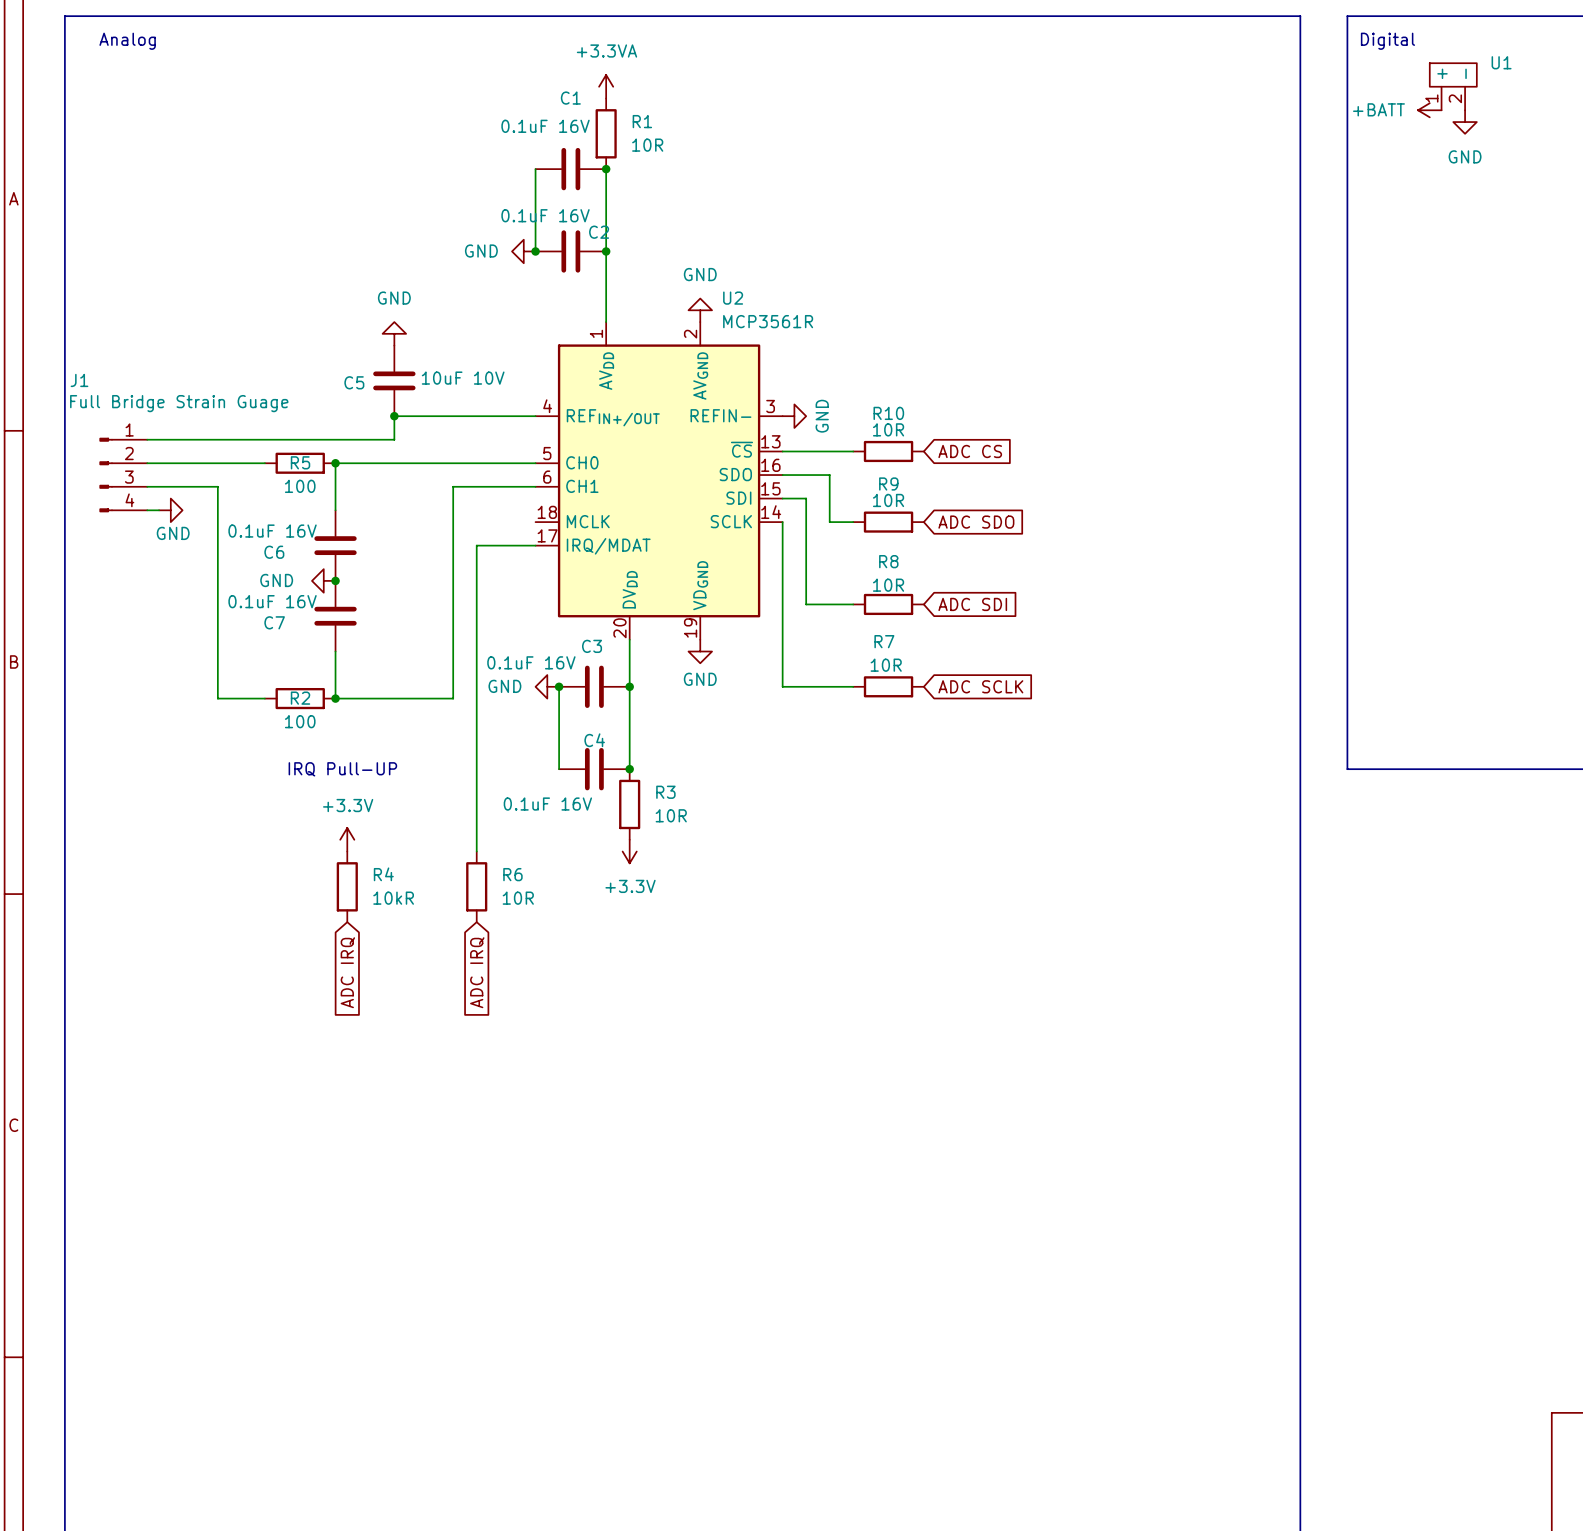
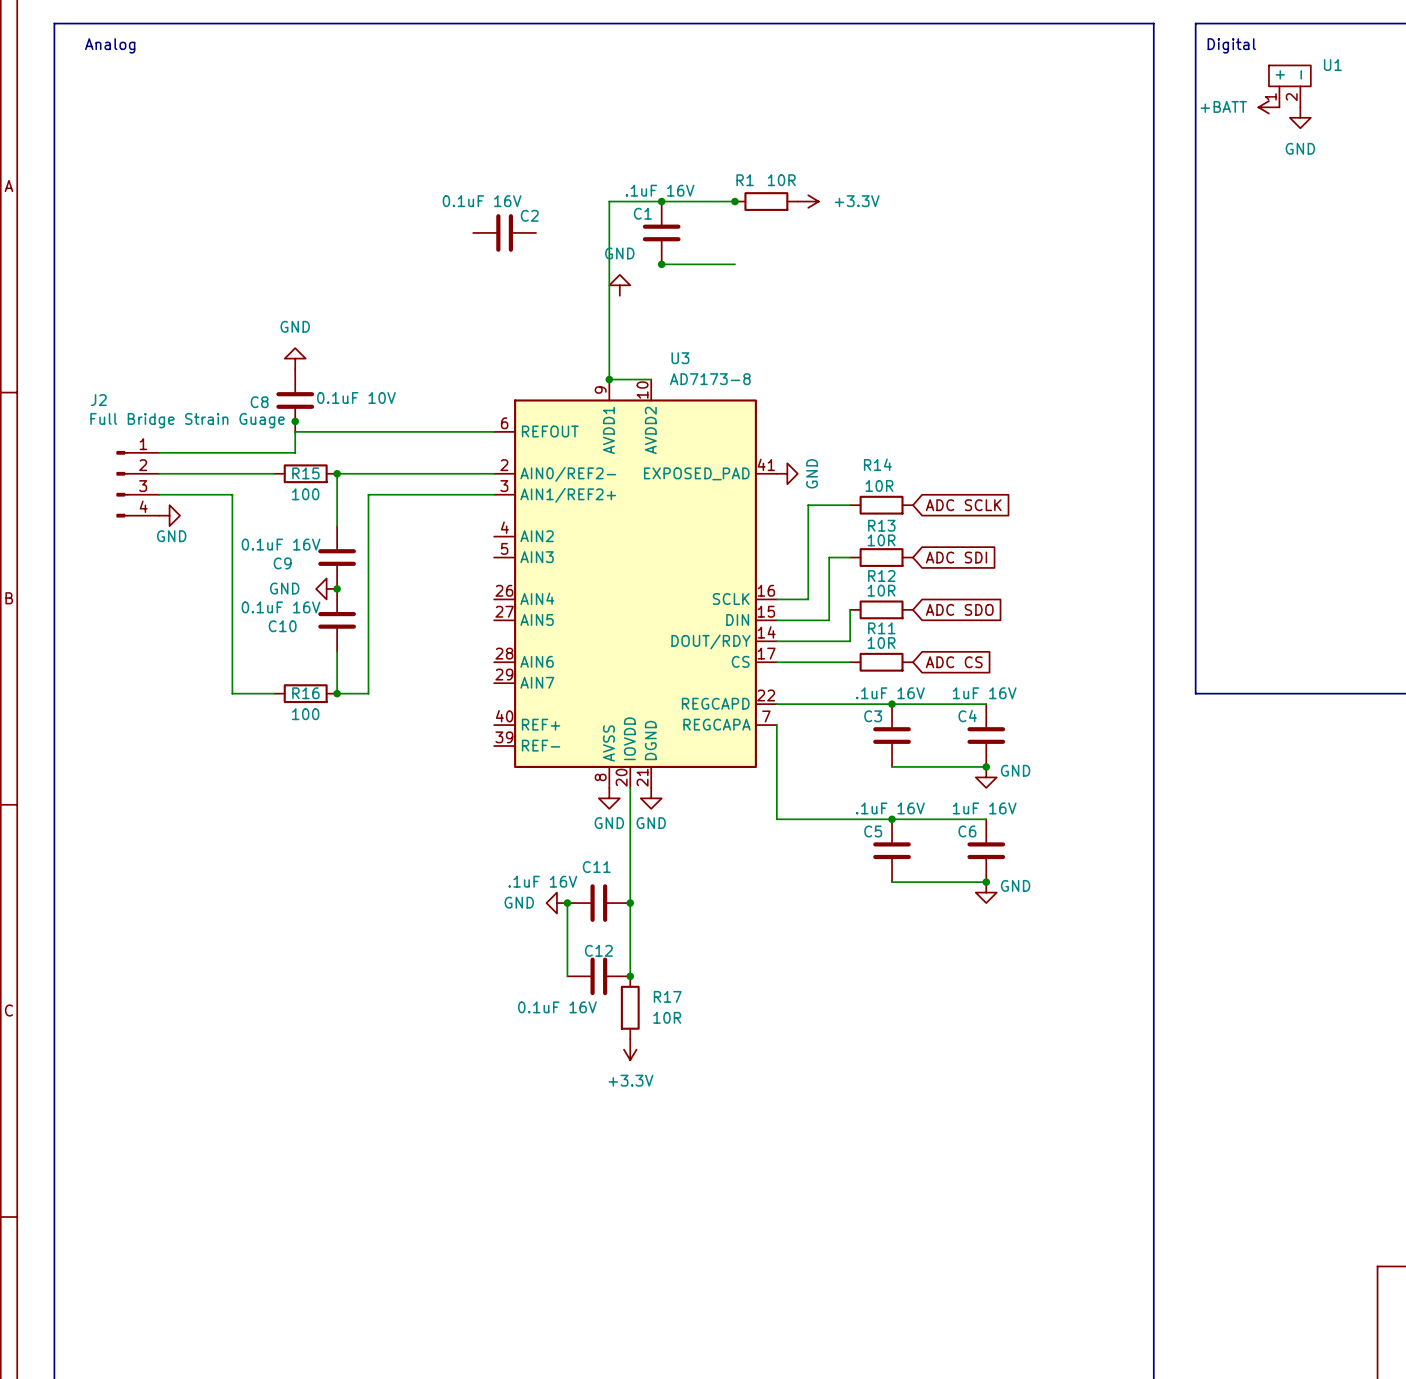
power symbol: +3.3VA (606, 86) -> none
C1 name position: C1 (570, 98) -> C1 (642, 213)
R1 name position: R1 (642, 121) -> R1 (745, 180)
C1 value: 0.1uF 16V (545, 126) -> .1uF 16V (660, 190)
R1 rotation: 0° (606, 133) -> 90° clockwise (766, 201)
R1 position: (606, 133) -> (766, 201)
R1 value position: 10R (647, 145) -> 10R (781, 180)
wire: (535, 169) (535, 251) -> none
C1 rotation: 0° (570, 169) -> 90° clockwise (661, 232)
C1 position: (570, 169) -> (661, 232)
wire: (606, 169) (606, 322) -> none
junction: (606, 169) -> none
junction: none -> (661, 201)
wire: none -> (734, 201) (609, 201) (609, 379) (651, 379)
junction: none -> (734, 201)
power symbol: none -> +3.3V (808, 201)
power symbol: GND (523, 251) -> none
junction: (535, 251) -> none
junction: (606, 251) -> none
wire: none -> (661, 264) (734, 264)
junction: none -> (661, 264)
power symbol position: GND (394, 333) -> GND (295, 358)
C5 value: 10uF 10V (463, 378) -> .1uF 16V (890, 808)
C5 position: (394, 380) -> (892, 850)
C5 name position: C5 (354, 382) -> C5 (873, 831)
junction: (394, 416) -> none
wire: (535, 416) (394, 416) (394, 439) (147, 439) -> none
junction: none -> (609, 379)
power symbol: GND (794, 416) -> none
C8: none -> 0.1uF 10V (295, 400)
R10: 10R (888, 451) -> none
global label: ADC CS (970, 451) -> none
wire: (147, 463) (264, 463) -> none
R5: 100 (300, 463) -> none
wire: (535, 463) (335, 463) (335, 475) -> (494, 431) (295, 431)
J1: Full Bridge Strain Guage (123, 475) -> none
U2: MCP3561R (659, 480) -> none
wire: (147, 486) (217, 486) (217, 698) (264, 698) -> none
wire: (535, 486) (453, 486) (453, 698) (335, 698) (335, 651) -> none
wire: (335, 498) (335, 510) -> (295, 452) (159, 452)
wire: (147, 510) (159, 510) -> none
power symbol position: GND (170, 510) -> GND (169, 515)
wire: none -> (159, 473) (274, 473)
R15: none -> 100 (305, 473)
junction: none -> (337, 473)
wire: none -> (494, 473) (337, 473) (337, 526)
R9: 10R (888, 522) -> none
power symbol: none -> GND (787, 473)
global label position: ADC SDO (976, 522) -> ADC SDO (959, 609)
C6 value: 0.1uF 16V (272, 531) -> 1uF 16V (984, 808)
J2: none -> Full Bridge Strain Guage (137, 484)
wire: none -> (159, 494) (232, 494) (232, 693) (274, 693)
C6 position: (335, 545) -> (986, 850)
wire: (476, 545) (476, 851) -> (420, 494) (368, 494) (368, 693) (337, 693) (337, 651)
C6 name position: C6 (274, 552) -> C6 (967, 831)
wire: none -> (850, 505) (808, 505) (808, 599) (776, 599)
R14: none -> 10R (881, 505)
power symbol: GND (323, 580) -> none
junction: (335, 580) -> none
R8: 10R (888, 604) -> none
global label position: ADC SDI (972, 604) -> ADC SDI (956, 557)
C7: 0.1uF 16V (335, 616) -> none
C9: none -> 0.1uF 16V (337, 557)
wire: none -> (850, 557) (829, 557) (829, 620) (776, 620)
R13: none -> 10R (881, 557)
U3: none -> AD7173-8 (635, 583)
C3 name position: C3 (592, 646) -> C3 (873, 716)
power symbol: none -> GND (326, 588)
junction: none -> (337, 588)
power symbol: GND (700, 651) -> none
C3 value: 0.1uF 16V (531, 662) -> .1uF 16V (890, 693)
wire: none -> (850, 609) (850, 641) (776, 641)
R12: none -> 10R (881, 609)
C10: none -> 0.1uF 16V (337, 620)
power symbol: GND (547, 686) -> none
wire: (559, 686) (559, 769) -> none
junction: (559, 686) -> none
C3 rotation: 0° (594, 686) -> 90° clockwise (892, 735)
C3 position: (594, 686) -> (892, 735)
junction: (629, 686) -> none
R7: 10R (888, 686) -> none
global label position: ADC SCLK (980, 686) -> ADC SCLK (963, 505)
R2: 100 (300, 698) -> none
junction: (335, 698) -> none
wire: none -> (776, 662) (850, 662)
R11: none -> 10R (881, 662)
global label: none -> ADC CS (954, 662)
C4 name position: C4 (594, 740) -> C4 (967, 716)
text: IRQ Pull-UP (342, 769) -> none
R16: none -> 100 (305, 693)
junction: none -> (337, 693)
C4 rotation: 0° (594, 769) -> 90° clockwise (986, 735)
C4 position: (594, 769) -> (986, 735)
junction: (629, 769) -> none
wire: none -> (776, 704) (986, 704)
junction: none -> (892, 704)
C4 value: 0.1uF 16V (547, 804) -> 1uF 16V (984, 693)
R3: 10R (629, 804) -> none
wire: none -> (776, 725) (776, 819) (986, 819)
power symbol: +3.3V (347, 839) -> none
power symbol: +3.3V (629, 851) -> none
wire: none -> (892, 766) (986, 766)
junction: none -> (986, 766)
power symbol: none -> GND (986, 777)
wire: none -> (630, 787) (630, 976)
R4: 10kR (347, 886) -> none
R6: 10R (476, 886) -> none
power symbol: none -> GND (609, 798)
power symbol: none -> GND (651, 798)
junction: none -> (892, 819)
global label: ADC IRQ (347, 972) -> none
global label: ADC IRQ (477, 972) -> none
wire: none -> (892, 882) (986, 882)
junction: none -> (986, 882)
power symbol: none -> GND (986, 892)
power symbol: none -> GND (556, 903)
wire: none -> (567, 903) (567, 976)
junction: none -> (567, 903)
C11: none -> .1uF 16V (598, 903)
junction: none -> (630, 903)
C12: none -> 0.1uF 16V (598, 976)
junction: none -> (630, 976)
R17: none -> 10R (630, 1007)
power symbol: none -> +3.3V (630, 1049)

